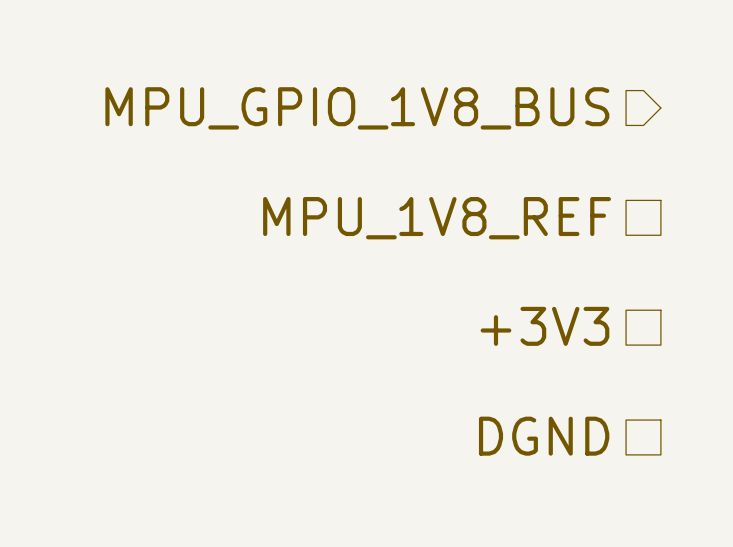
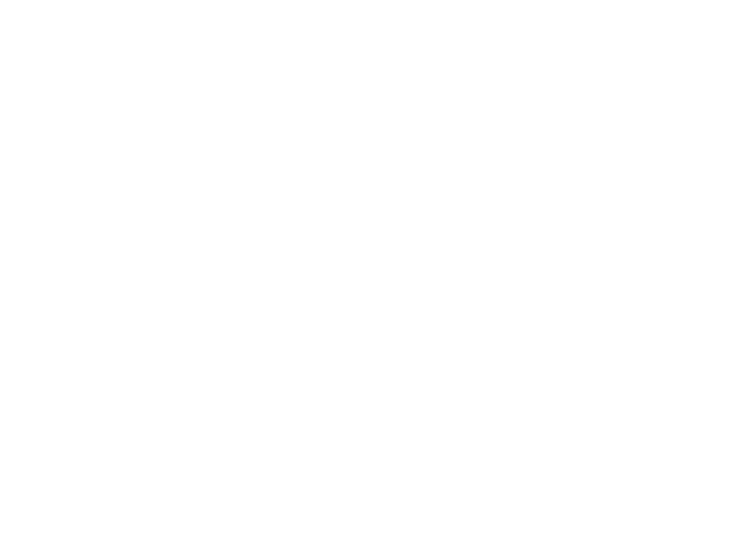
hierarchical label: MPU_GPIO_1V8_BUS (357, 108) -> none
hierarchical label: MPU_1V8_REF (437, 218) -> none
hierarchical label: +3V3 (544, 326) -> none
hierarchical label: DGND (544, 436) -> none

